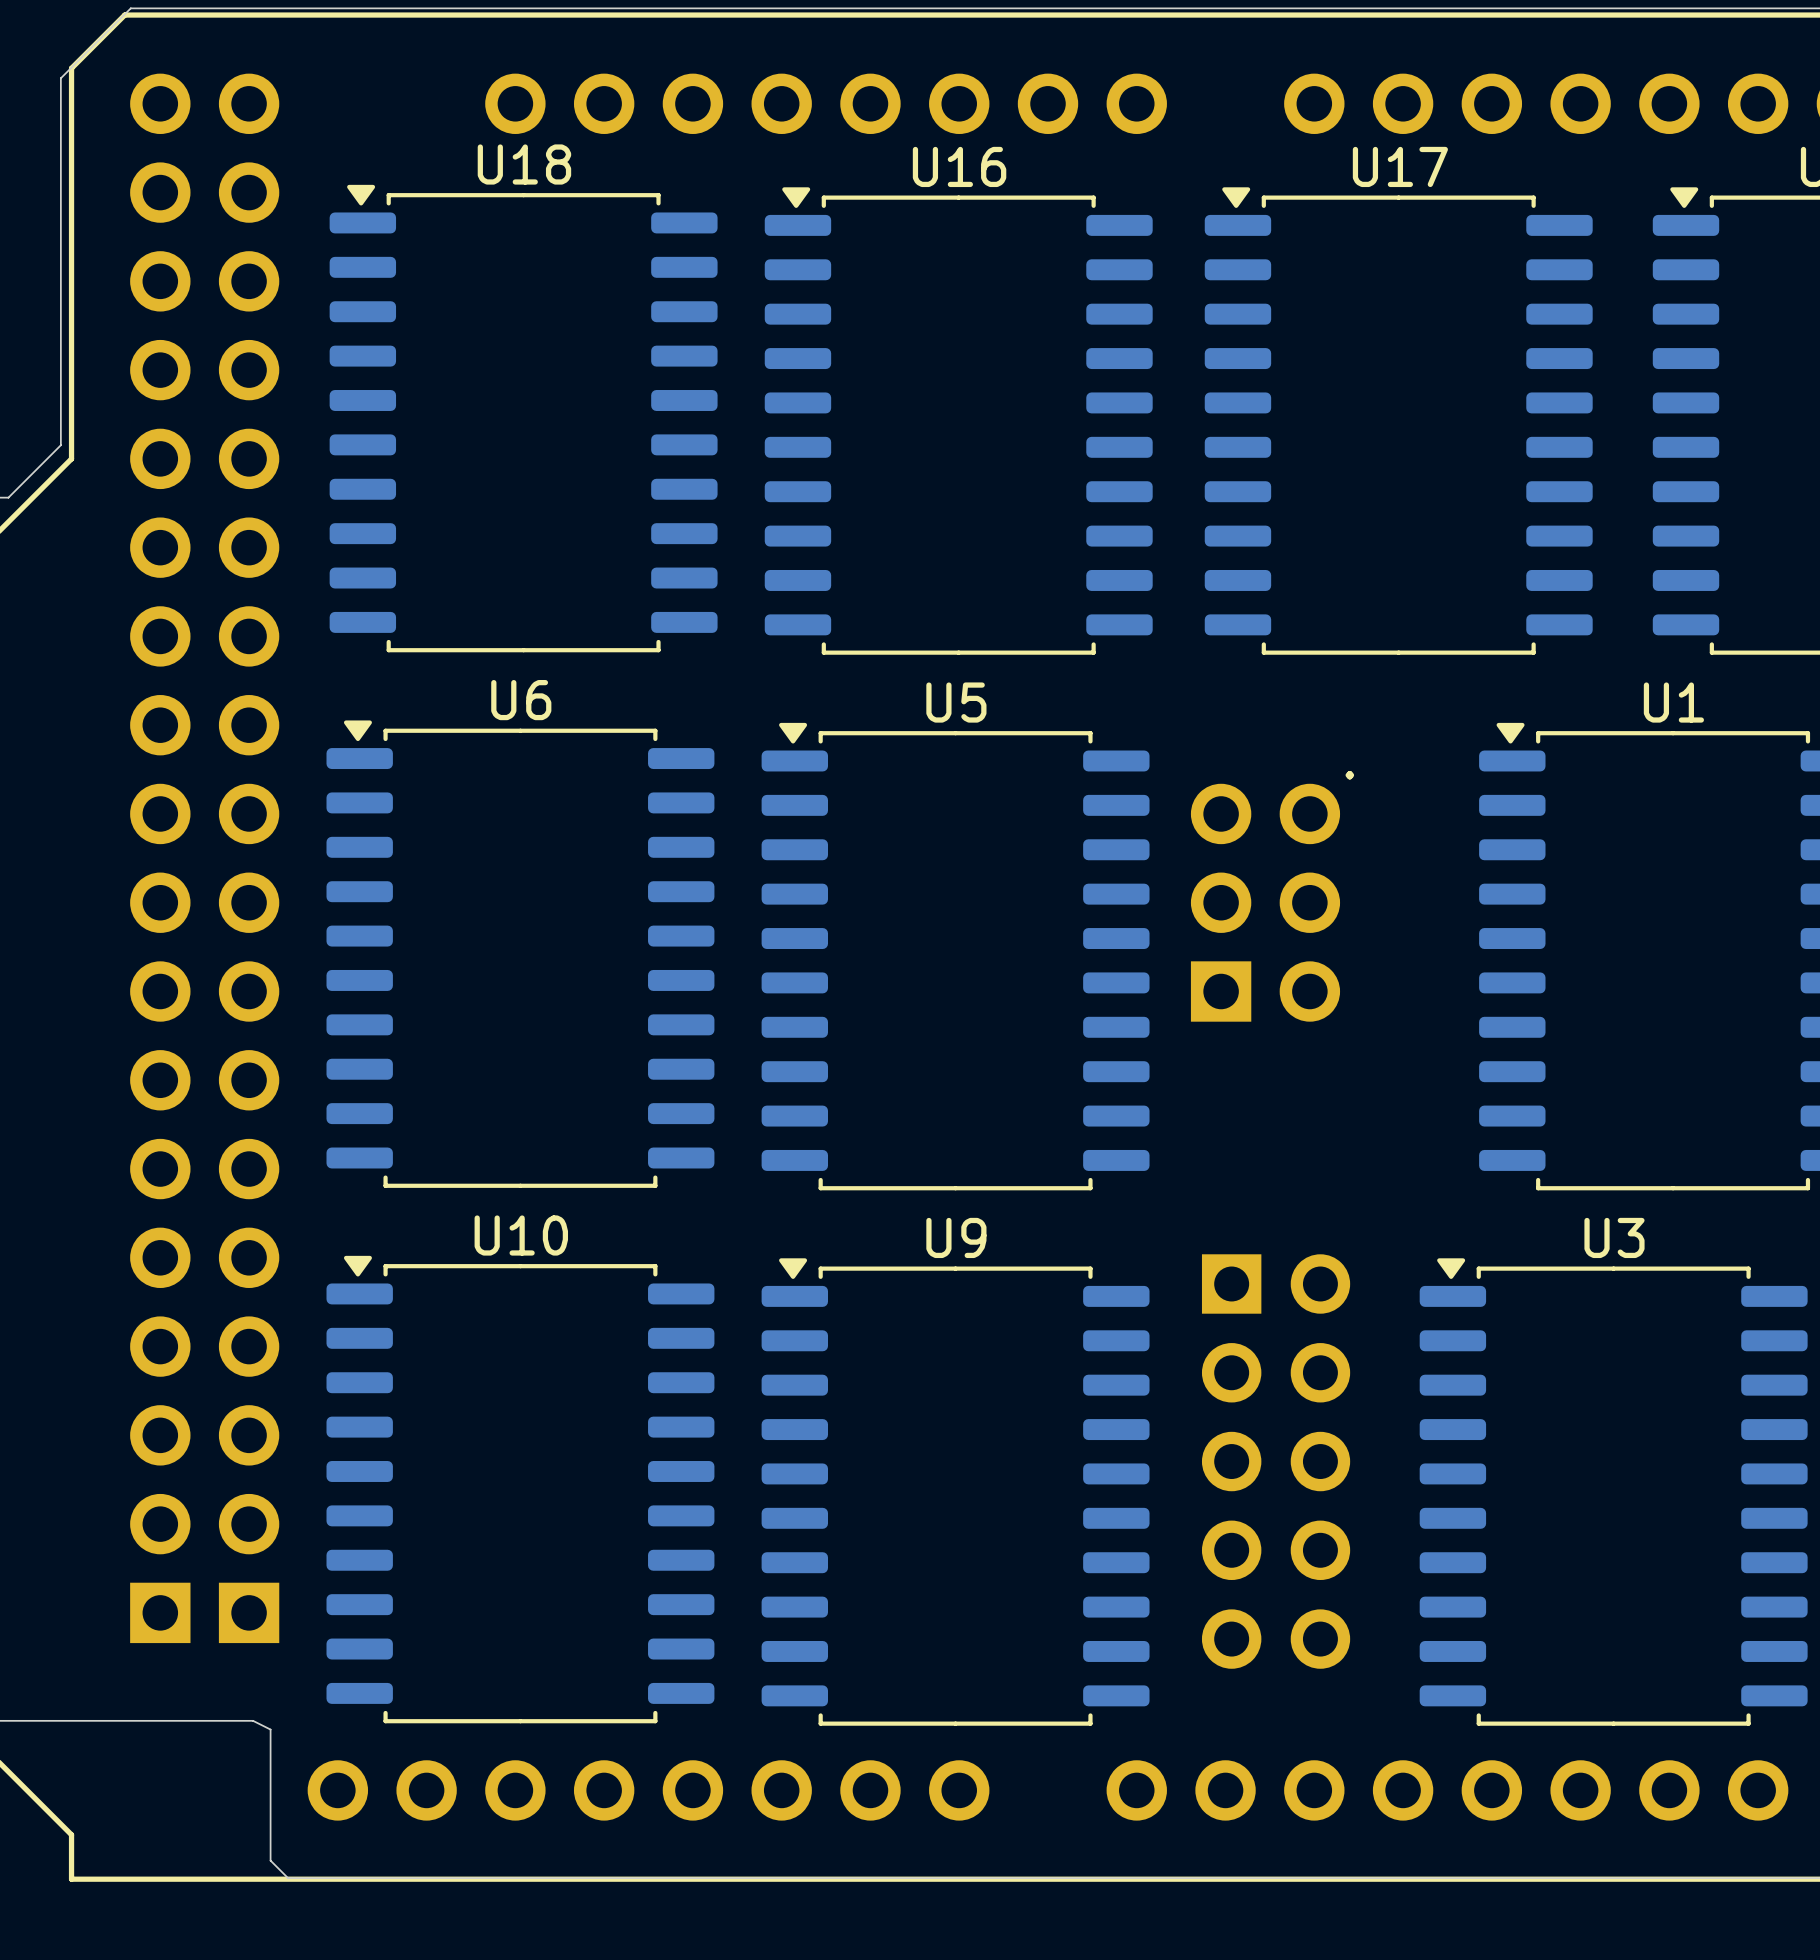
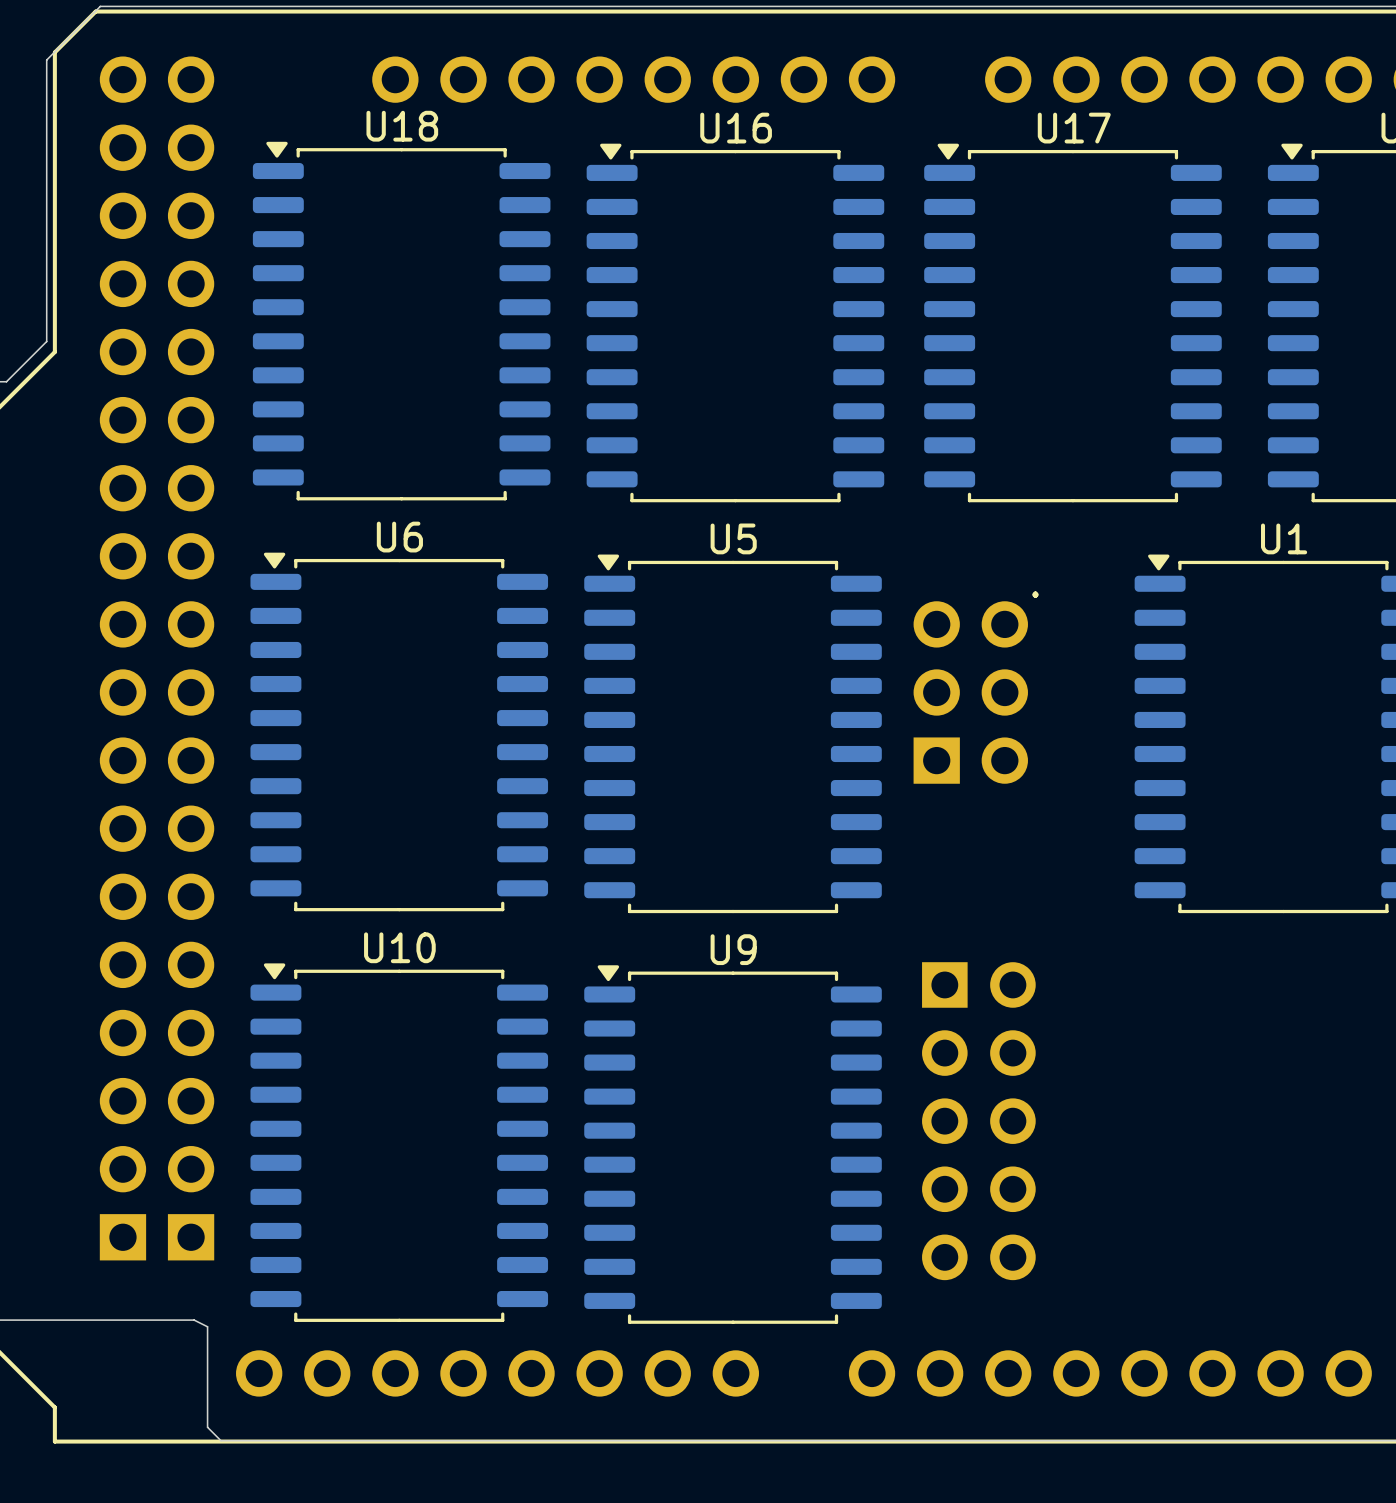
U3: (1613, 1492) -> none

